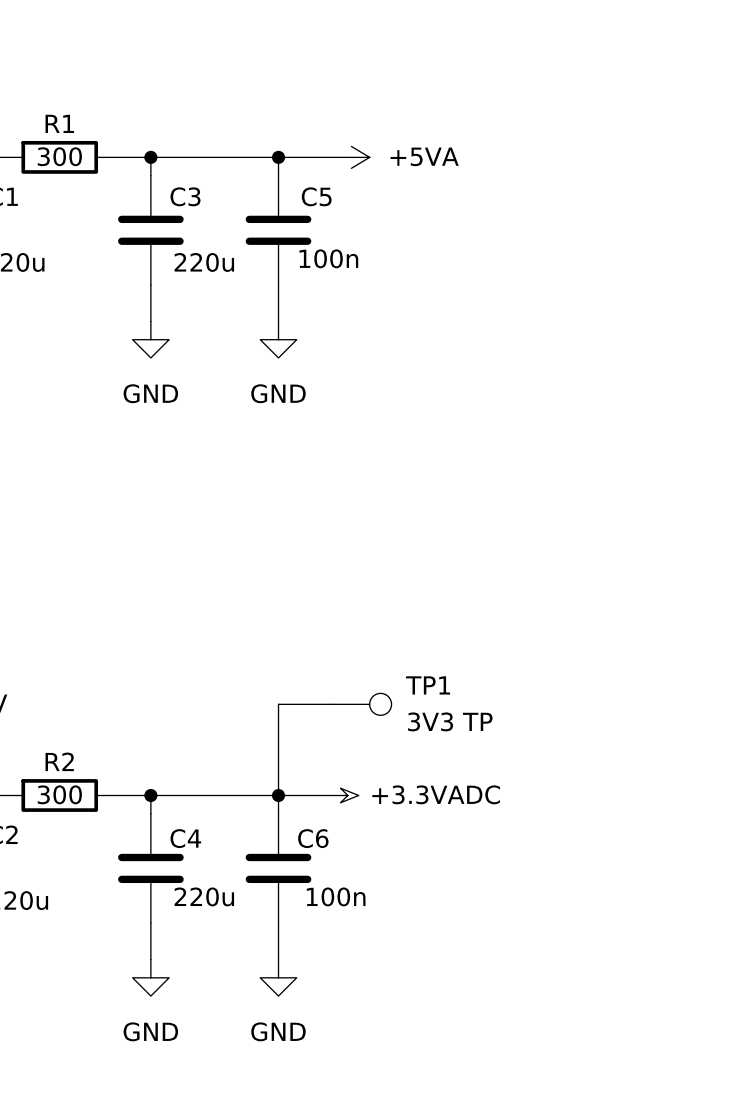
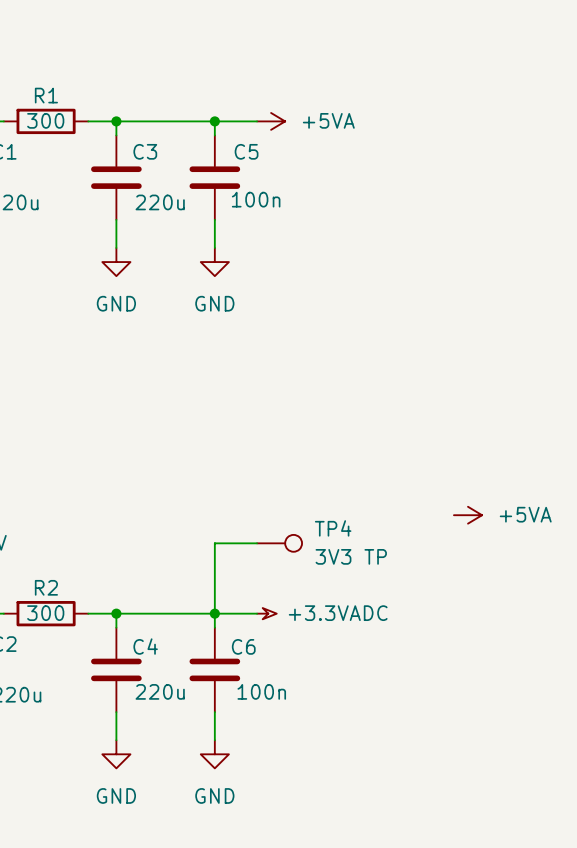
power symbol: none -> +5VA (468, 515)
TP1 name: TP1 (428, 685) -> TP4 (333, 528)

